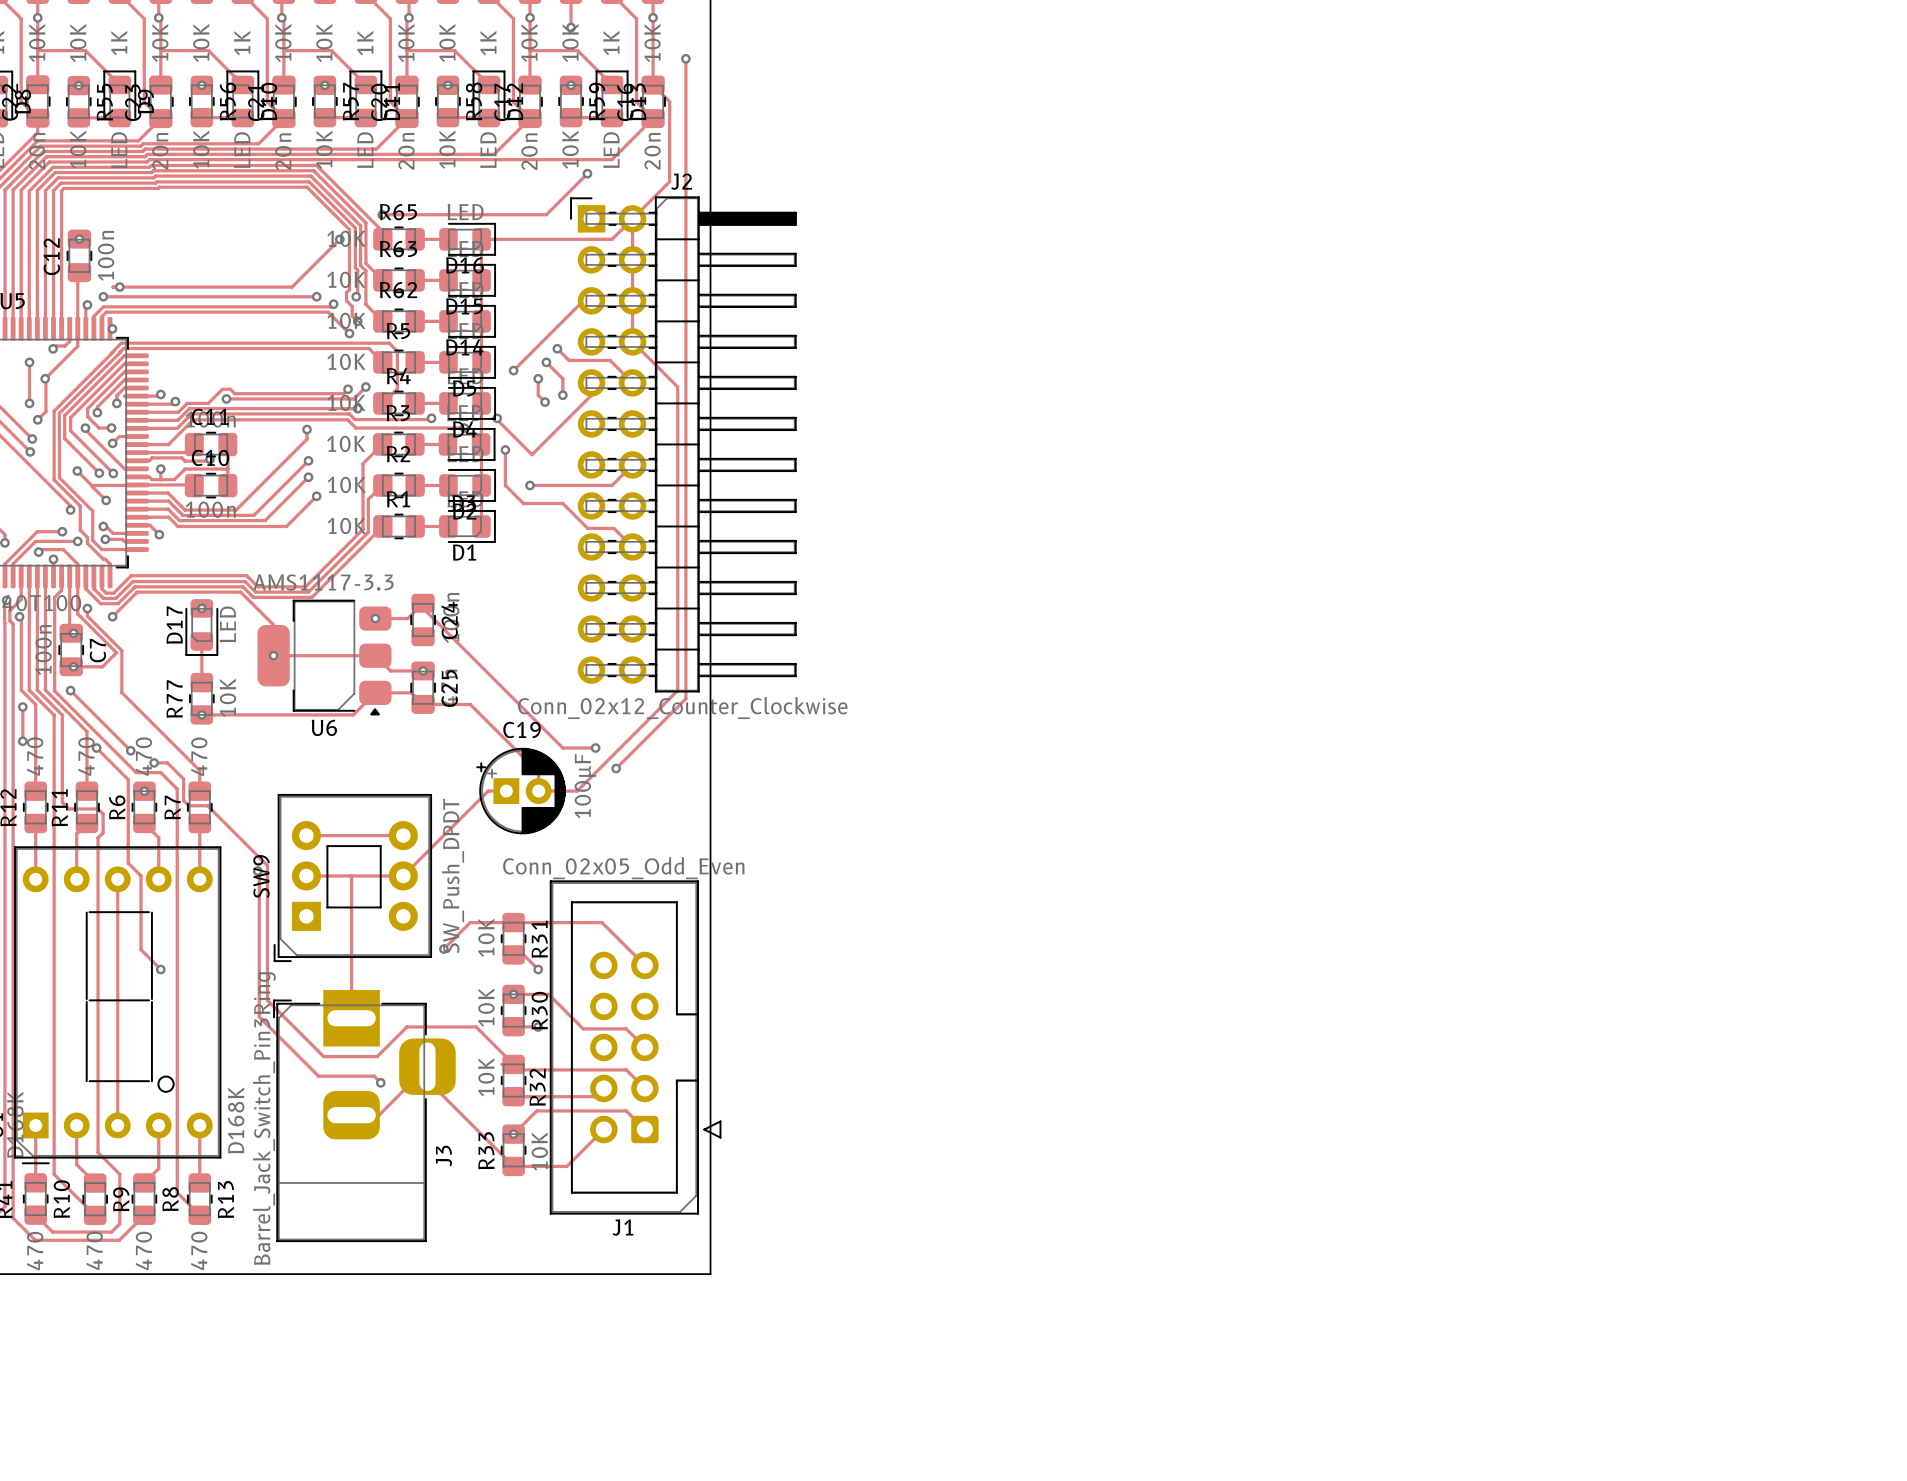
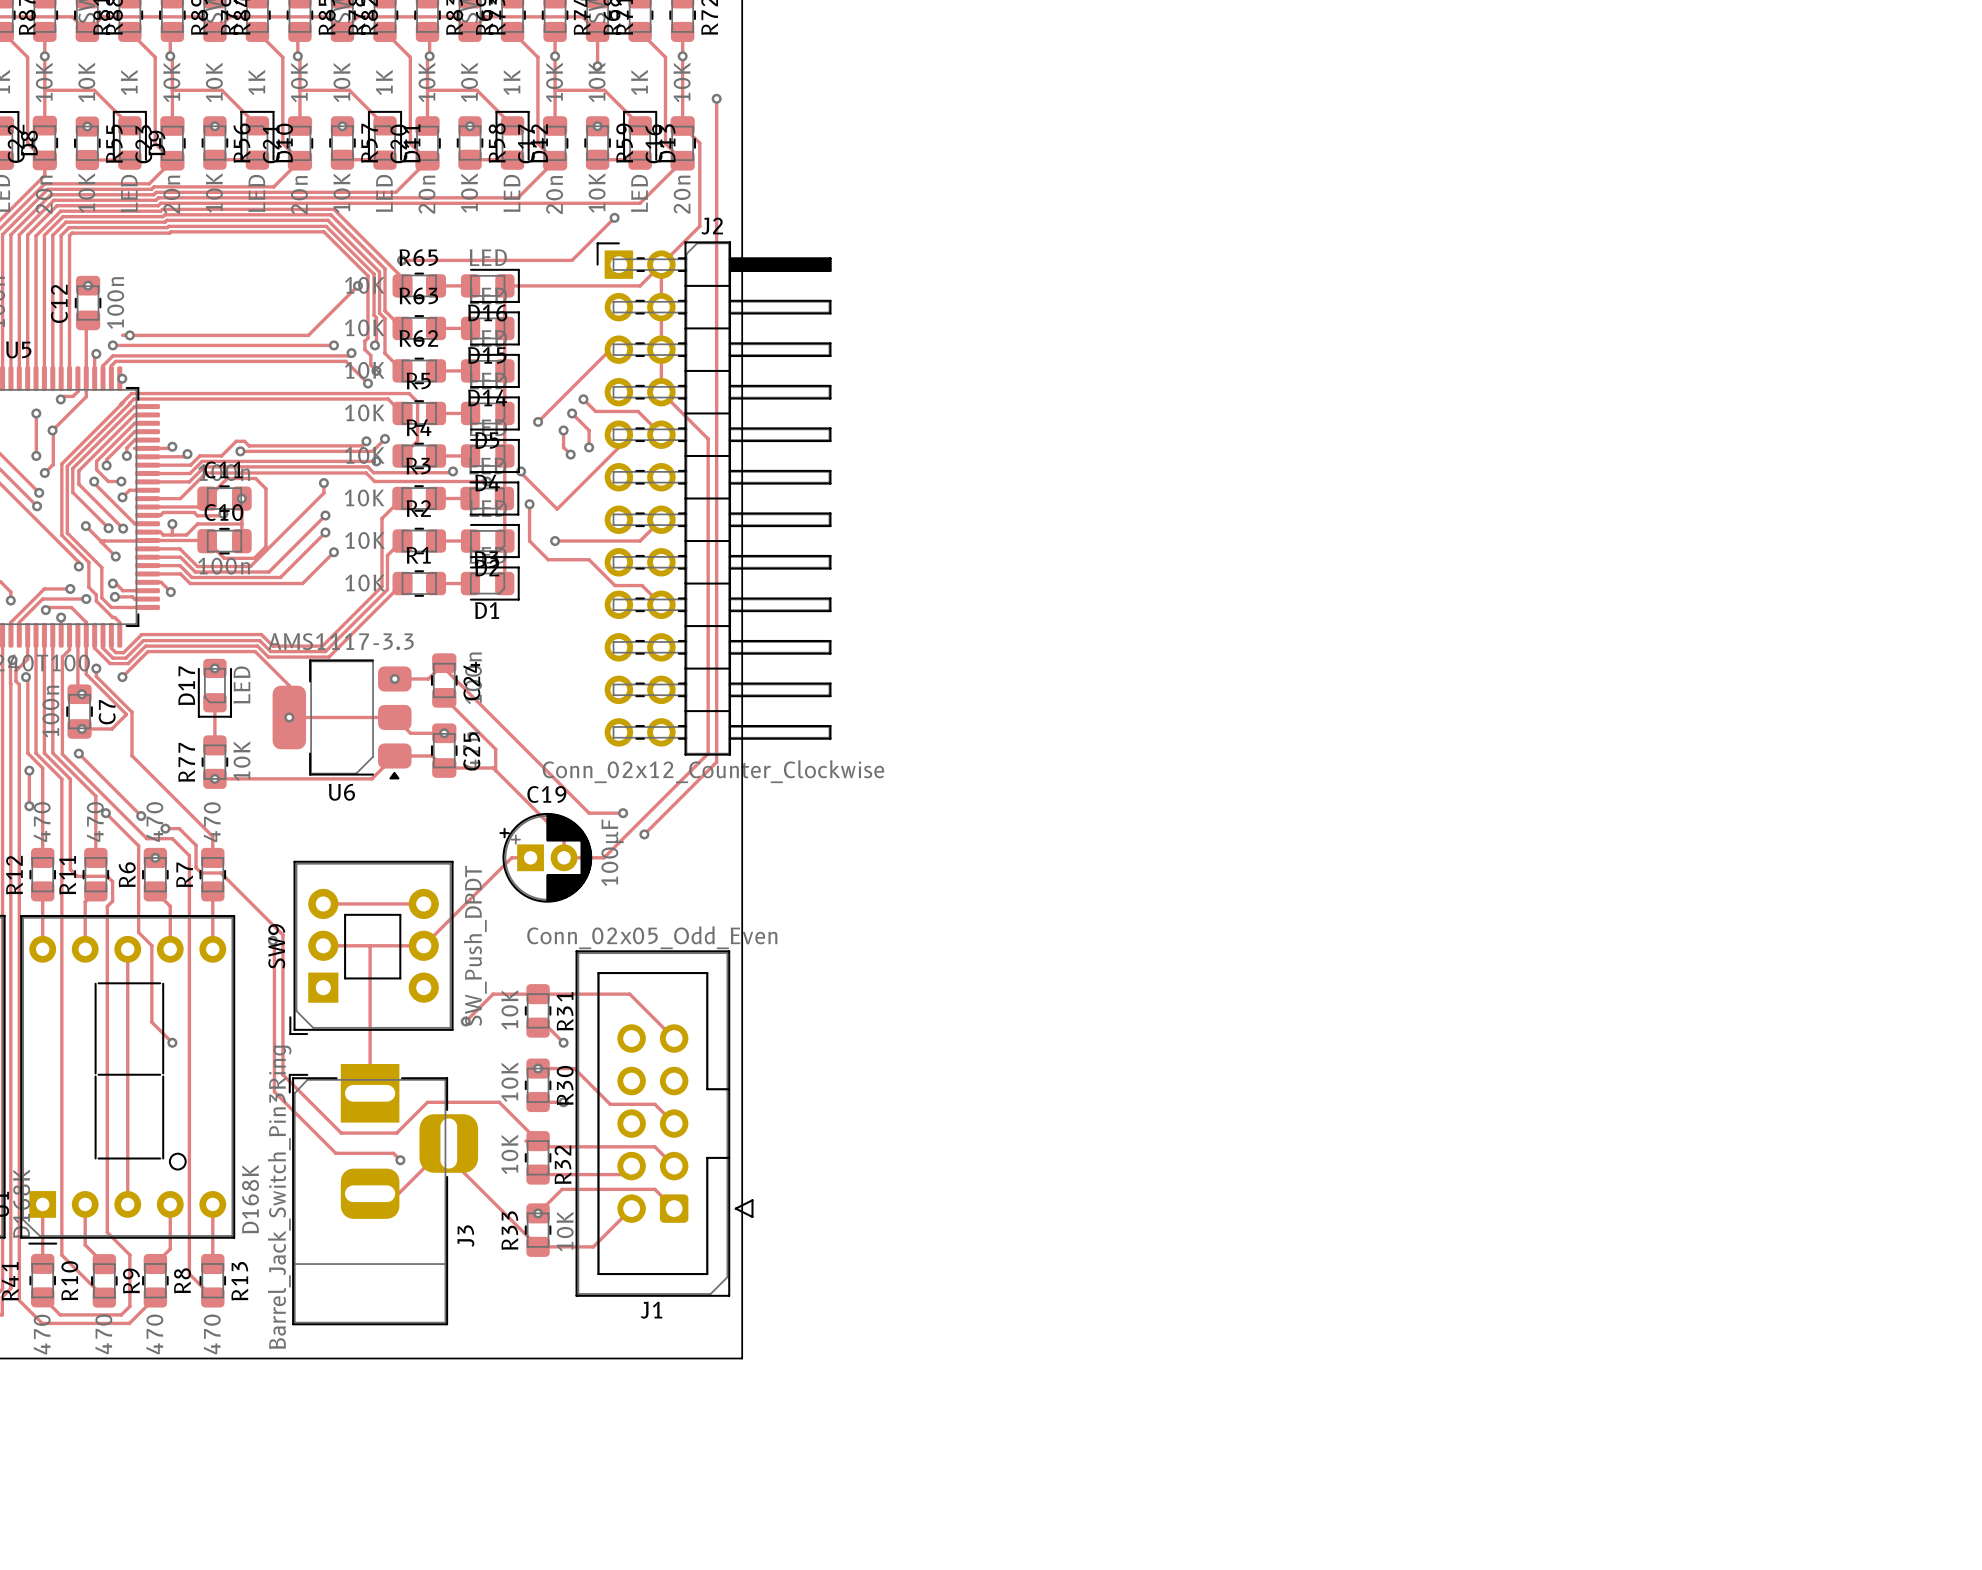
track: none -> (207, 498) (227, 478) (255, 478) (265, 488) (265, 546) (254, 558) (224, 558) (207, 541)
via: none -> (241, 498)
track: none -> (444, 697) (495, 749) (495, 770)

